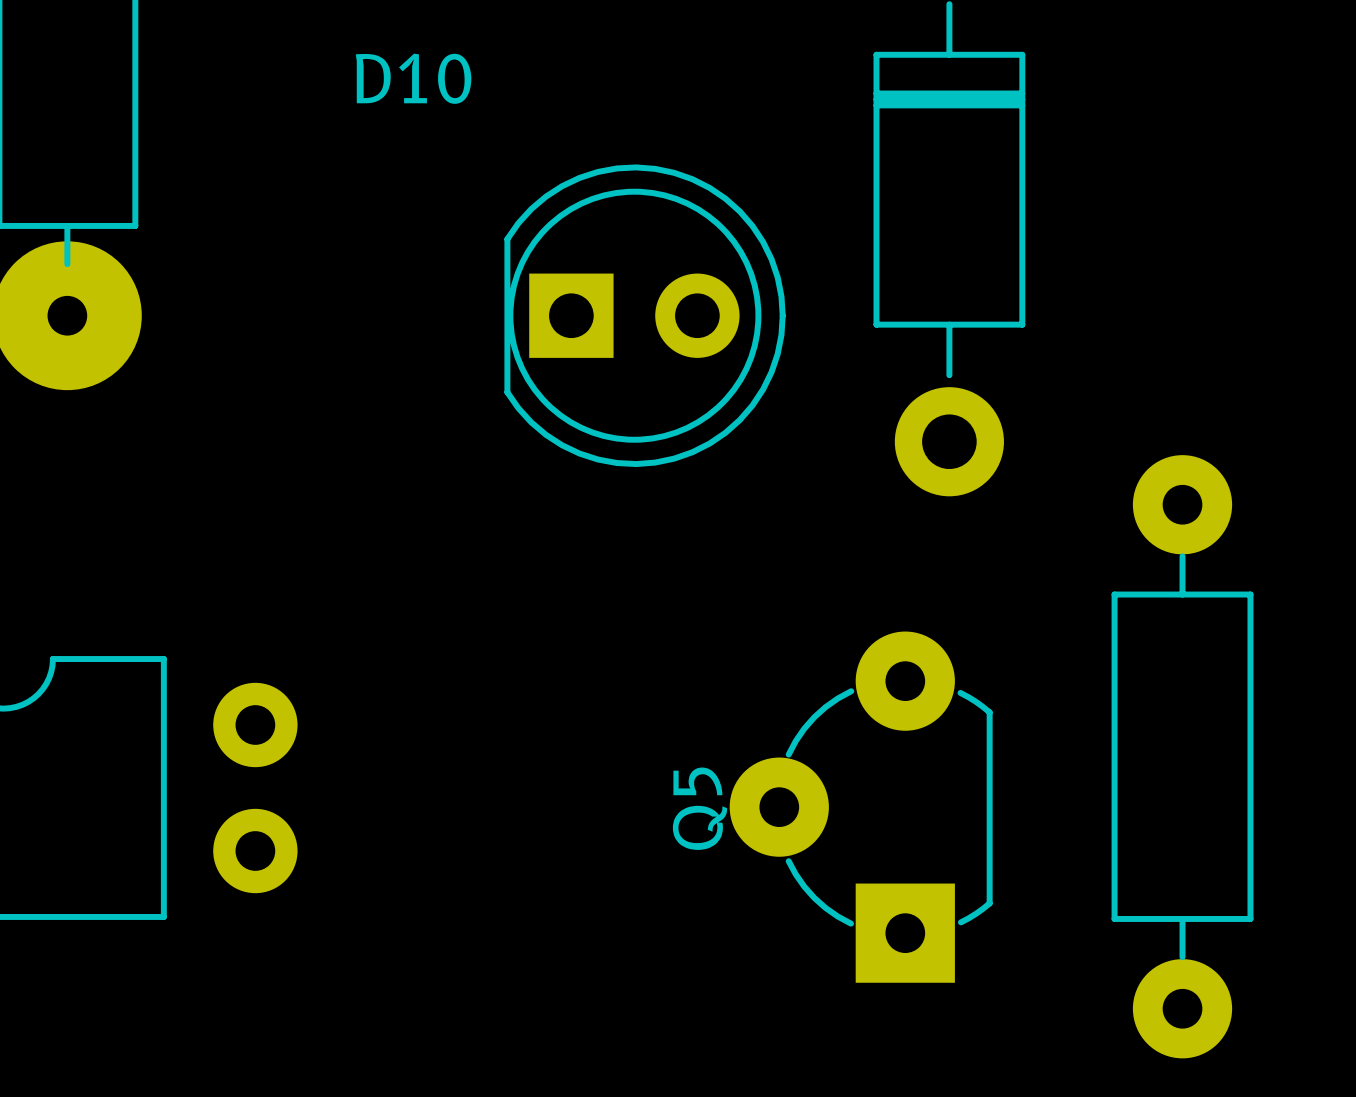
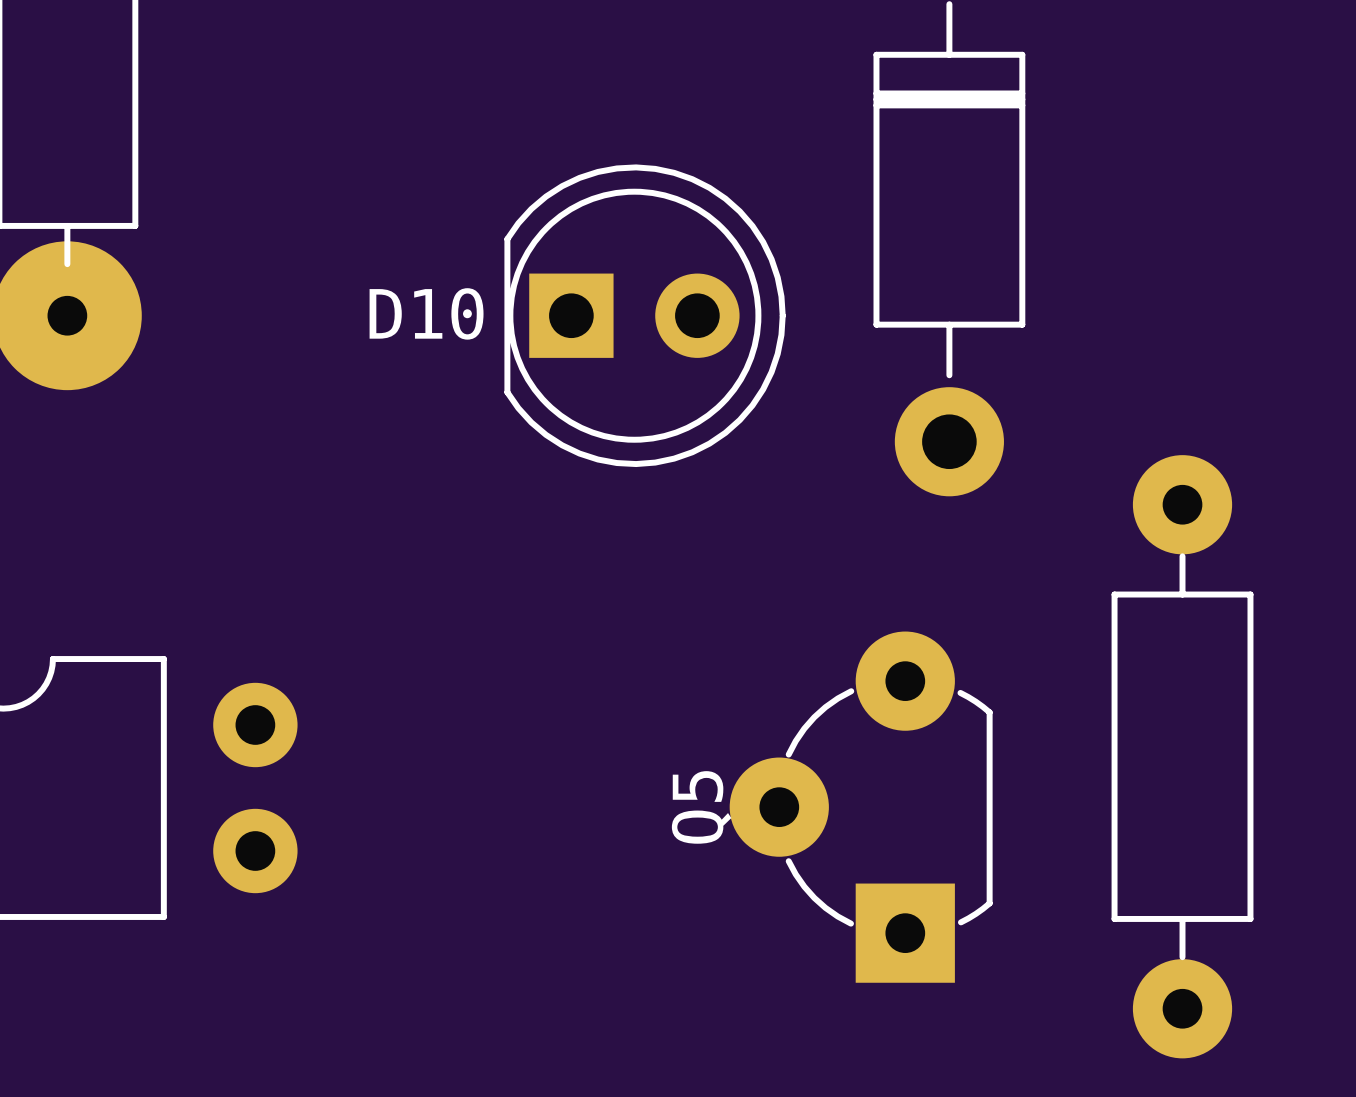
D10 name position: D10 (413, 78) -> D10 (426, 313)

